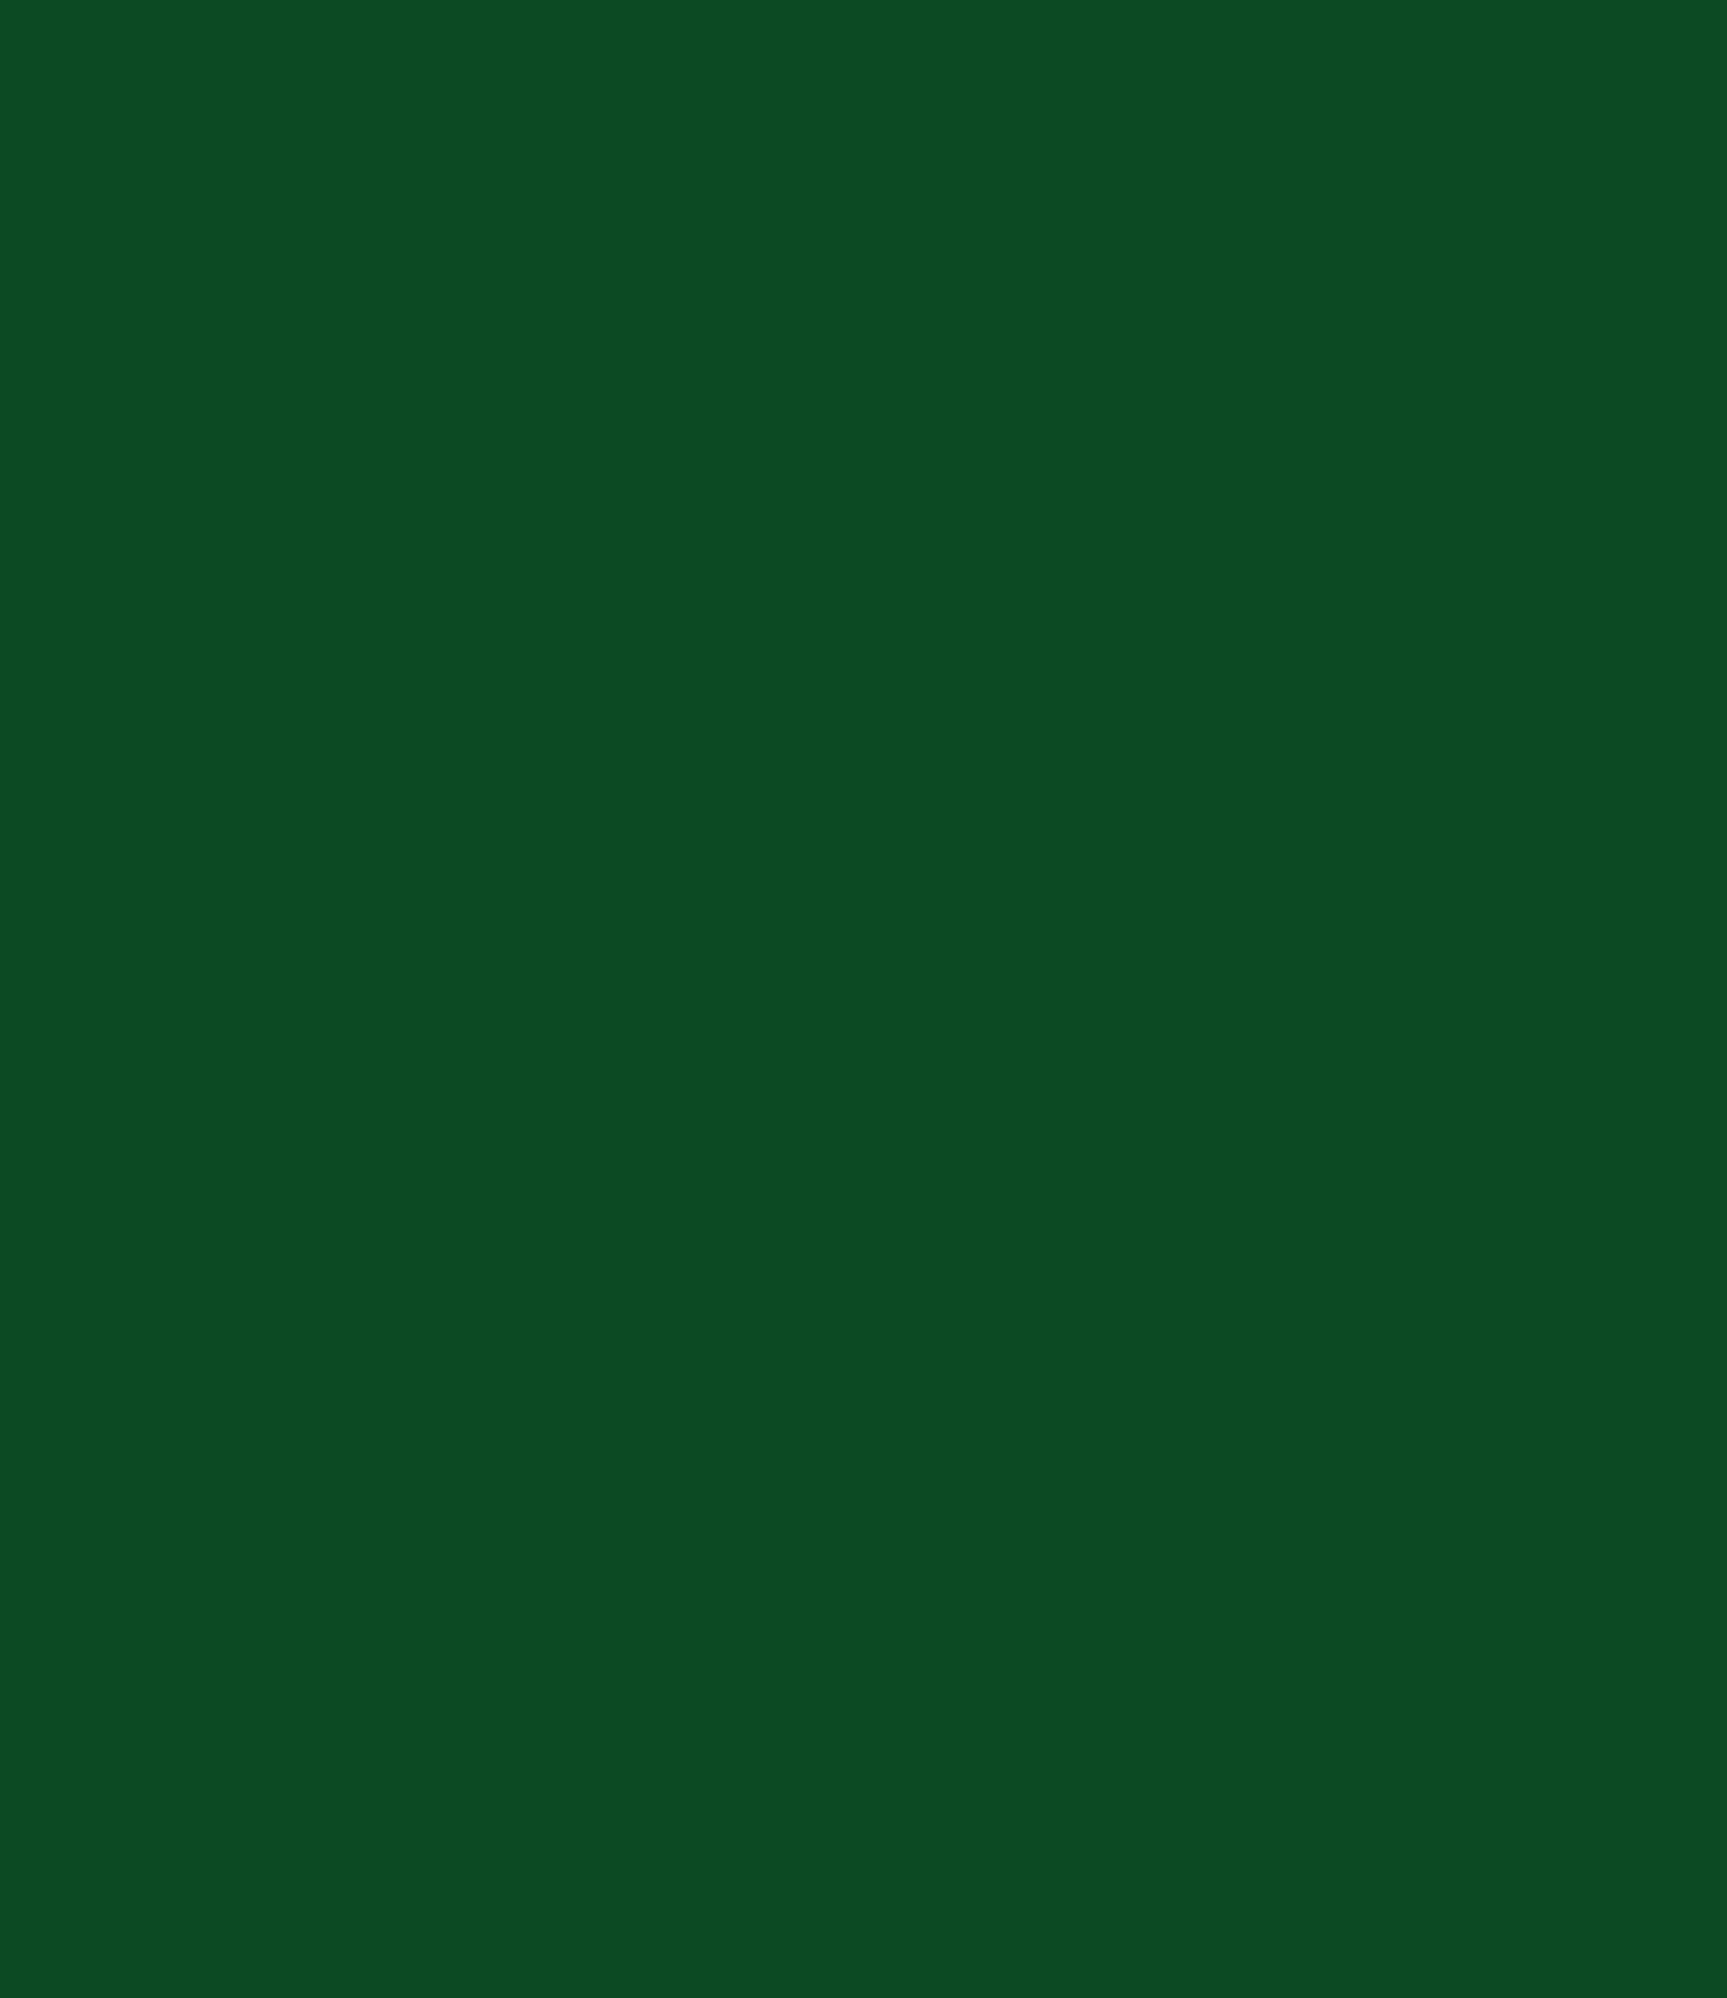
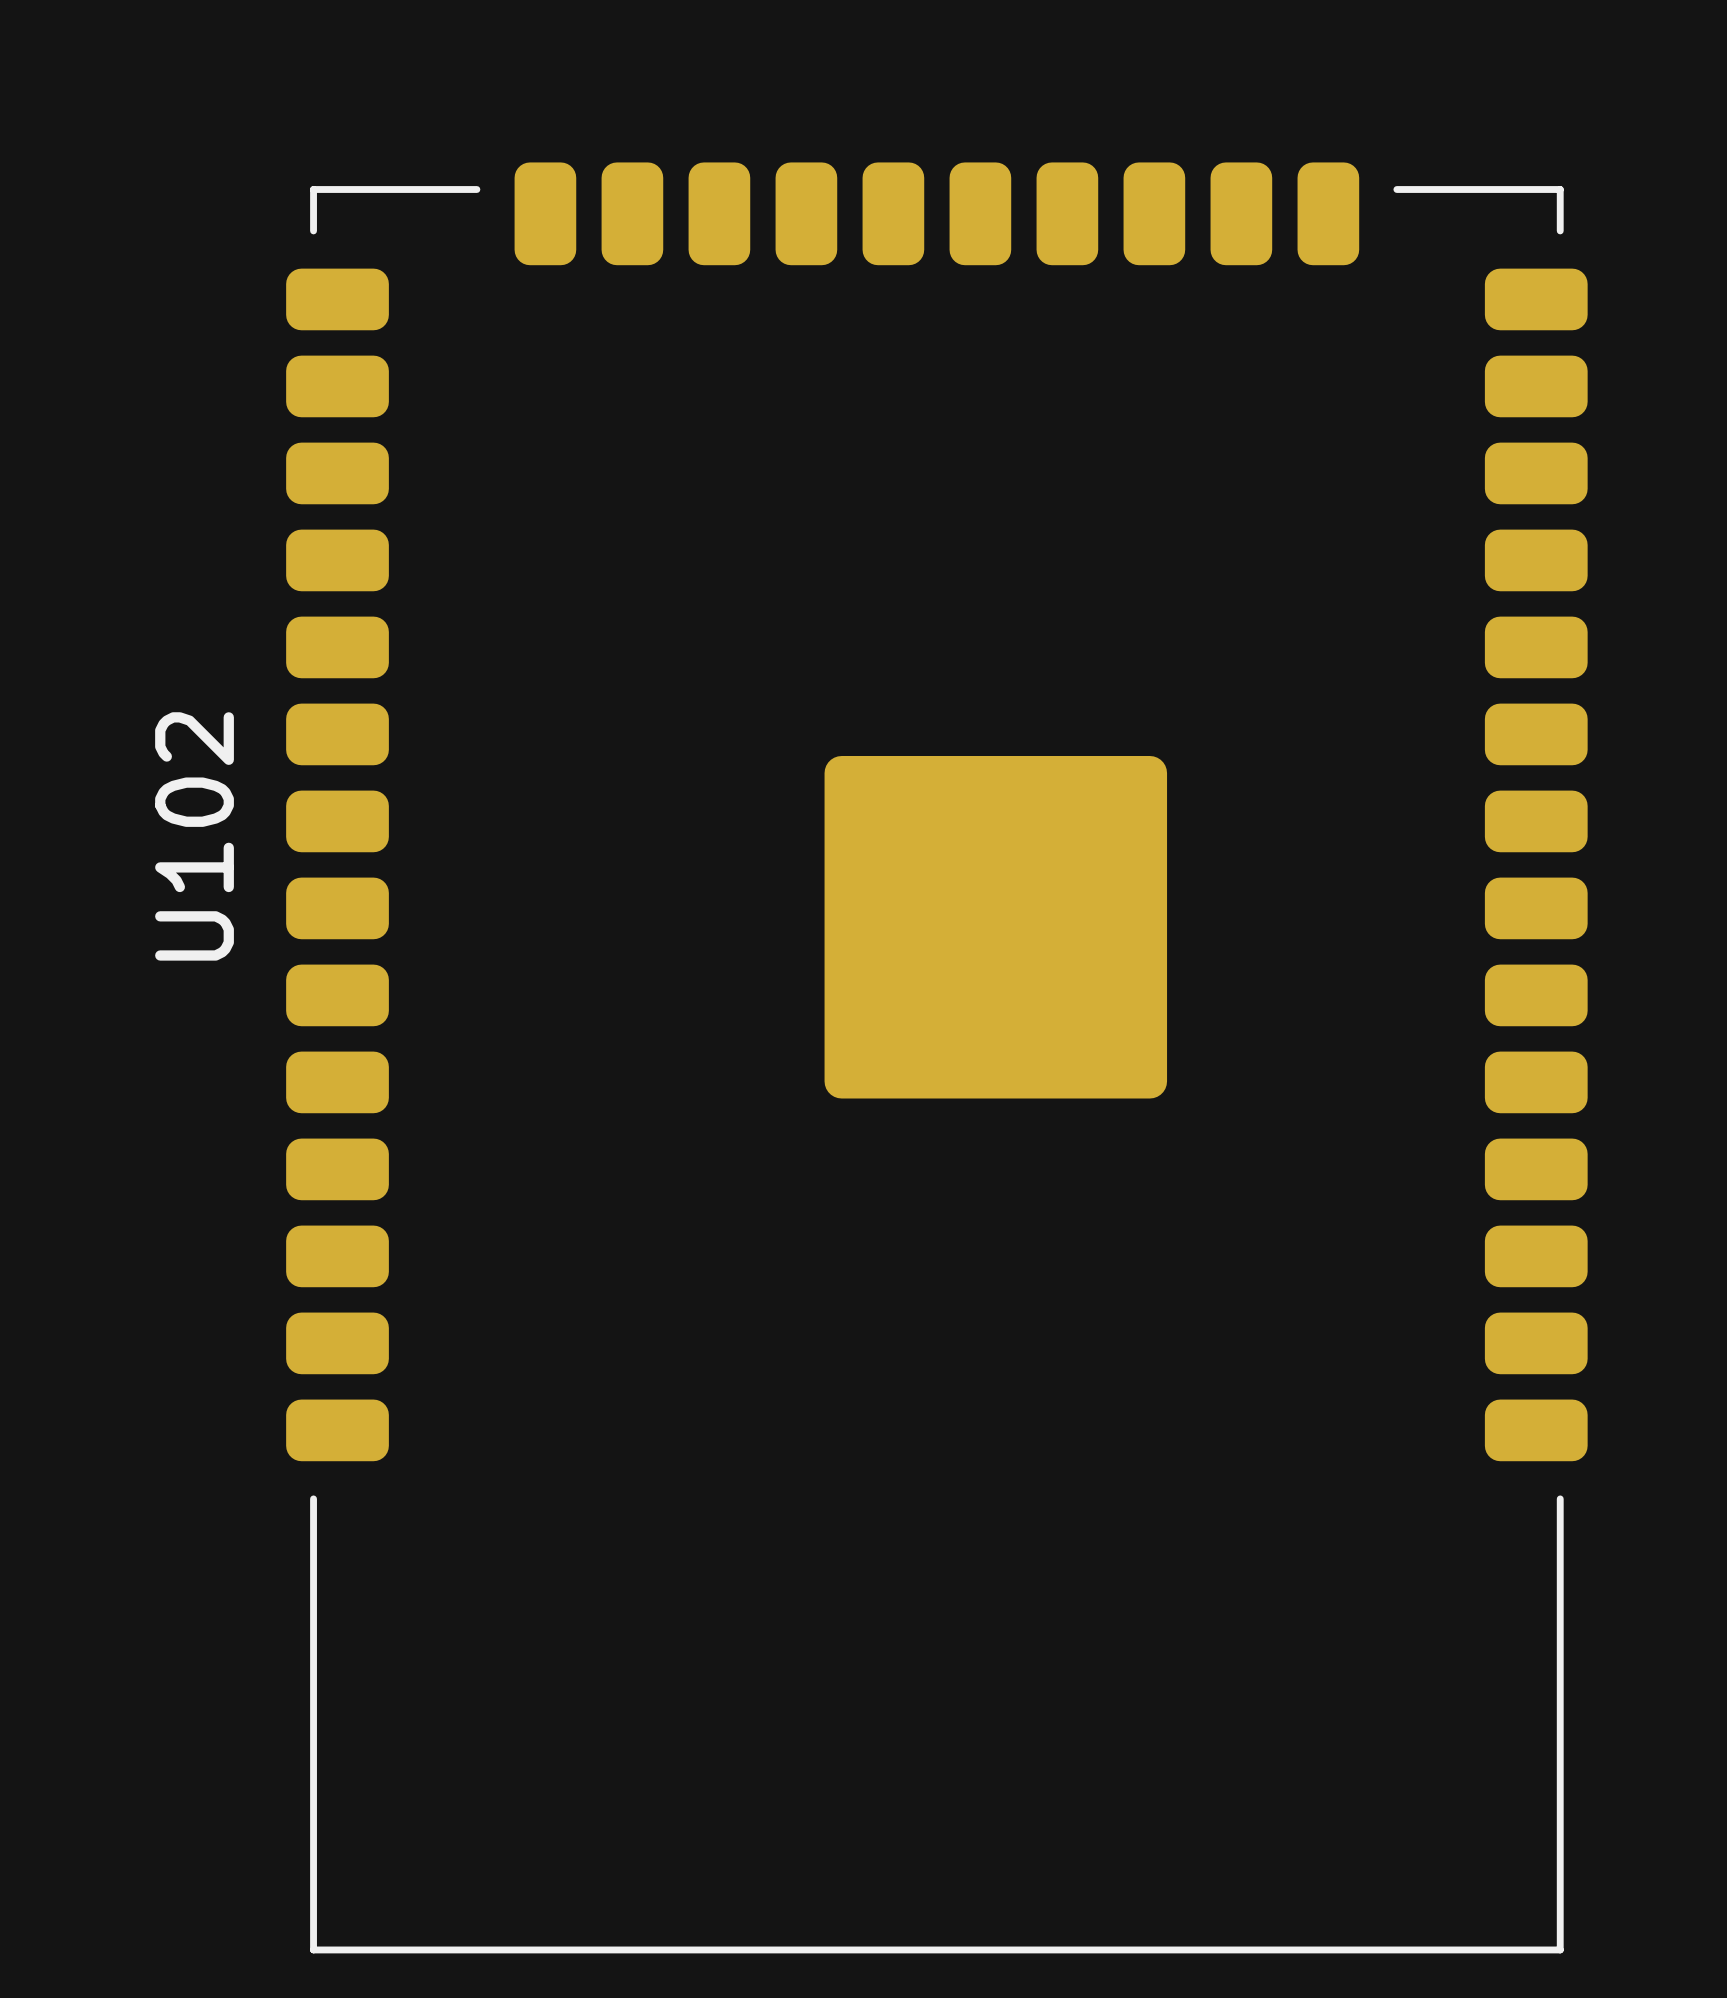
U102: none -> (936, 1057)

